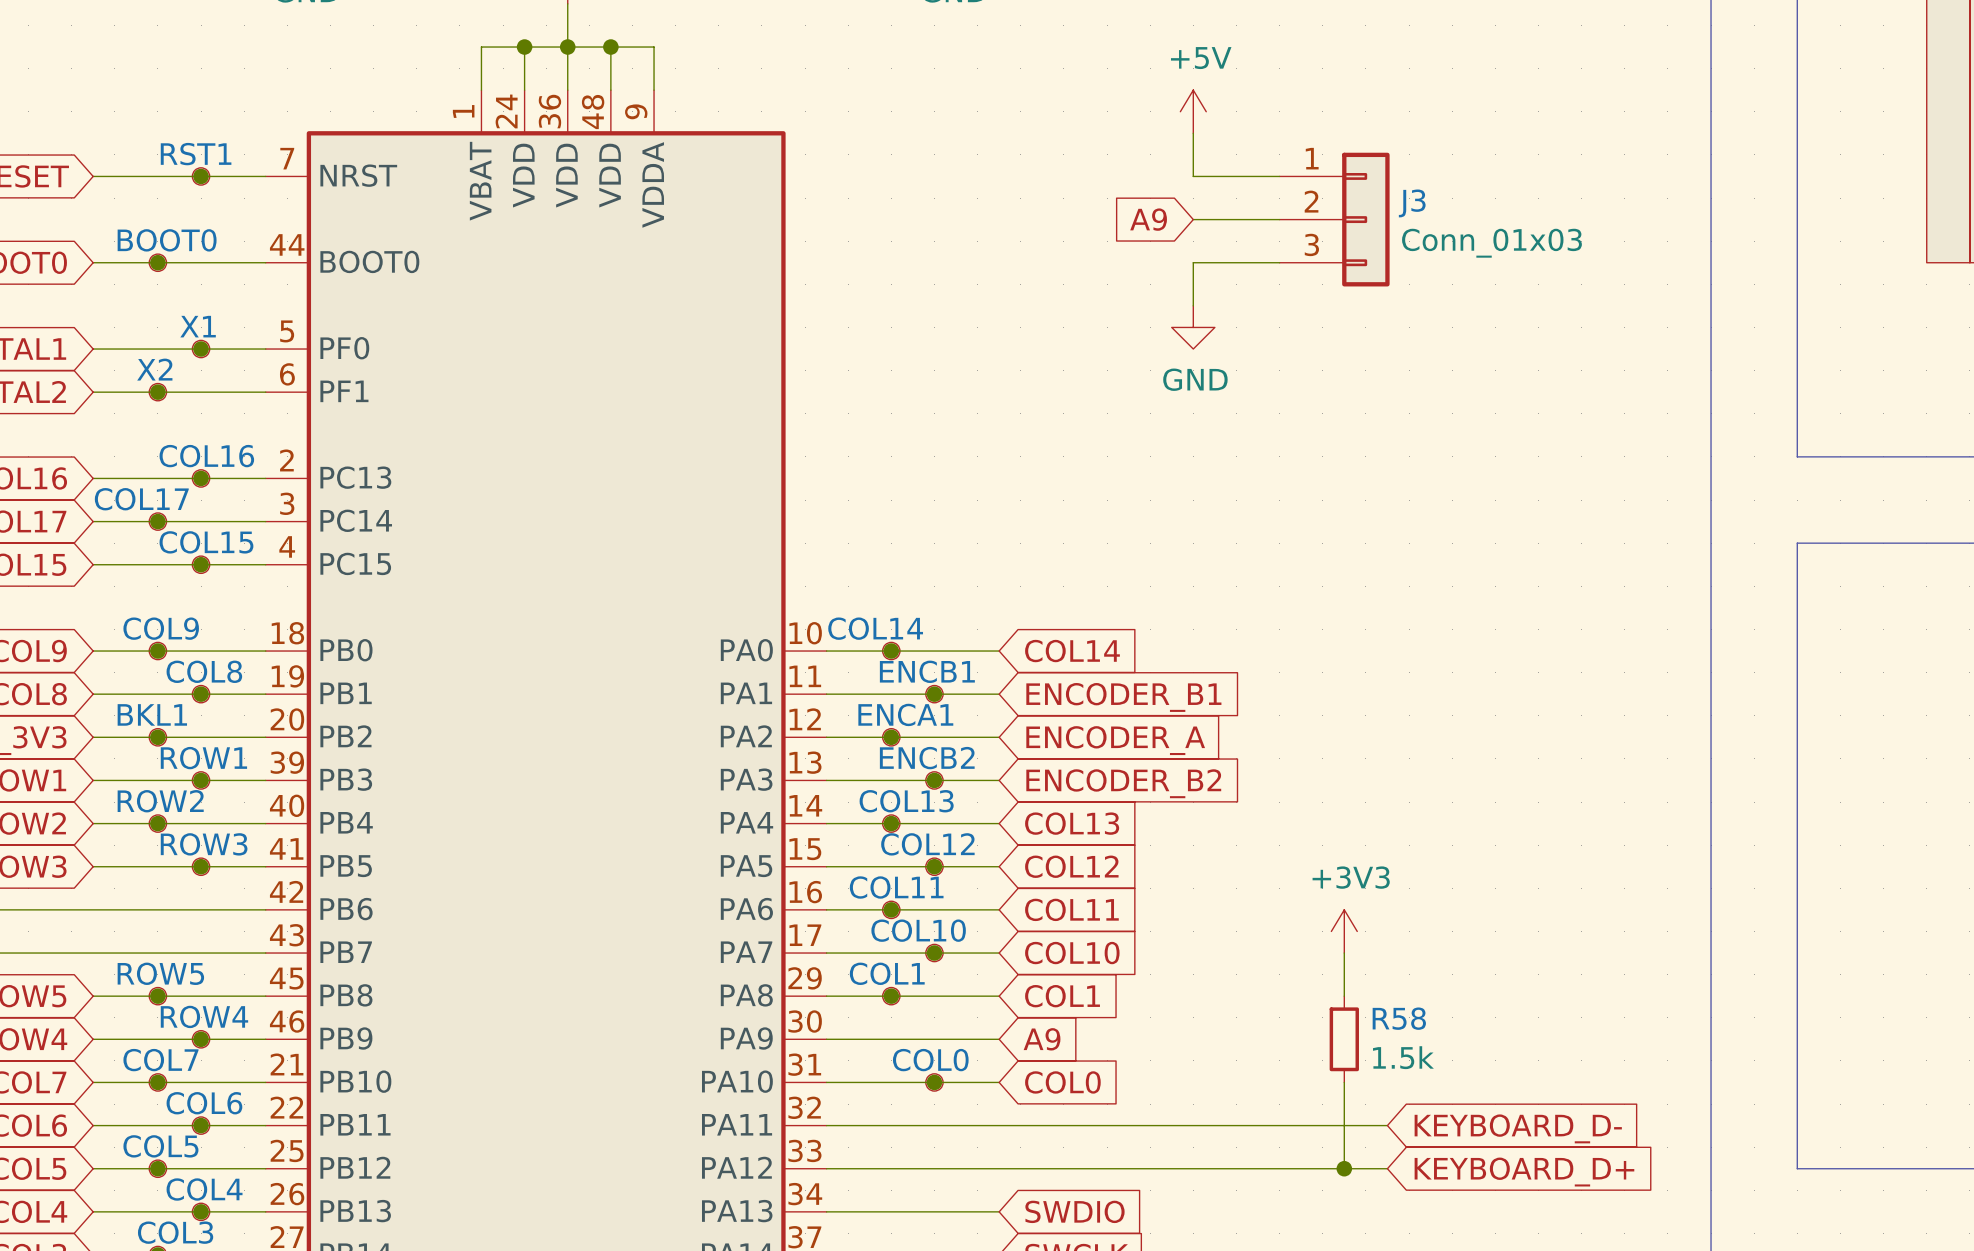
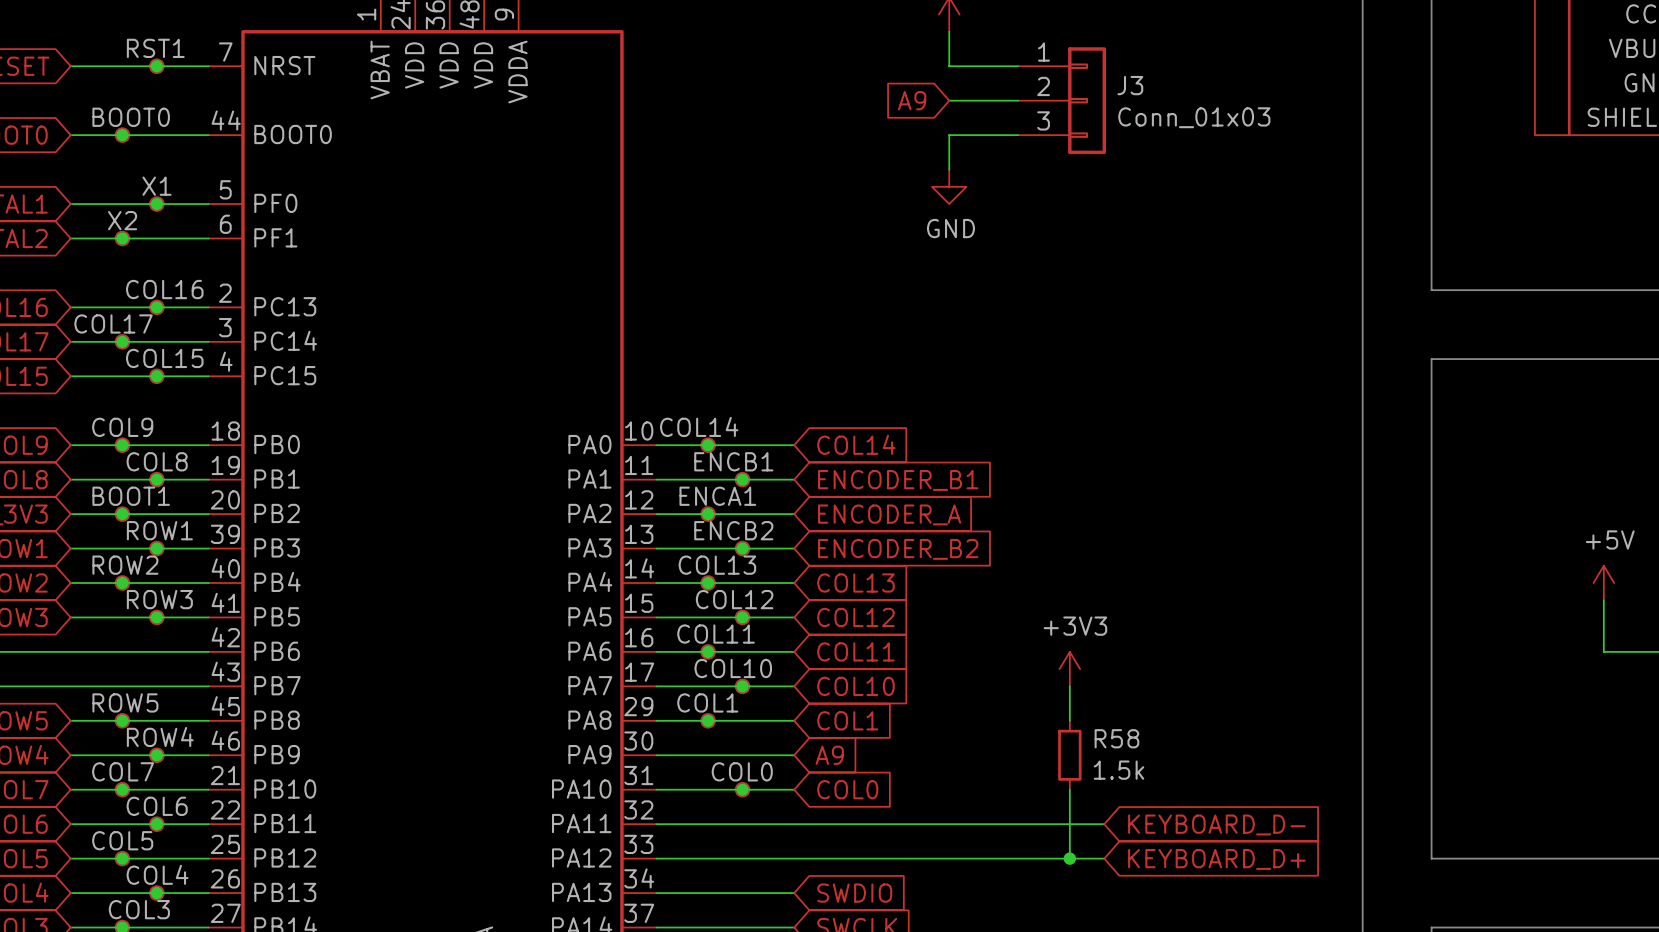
BKL1 name: BKL1 (152, 714) -> BOOT1 (131, 496)

